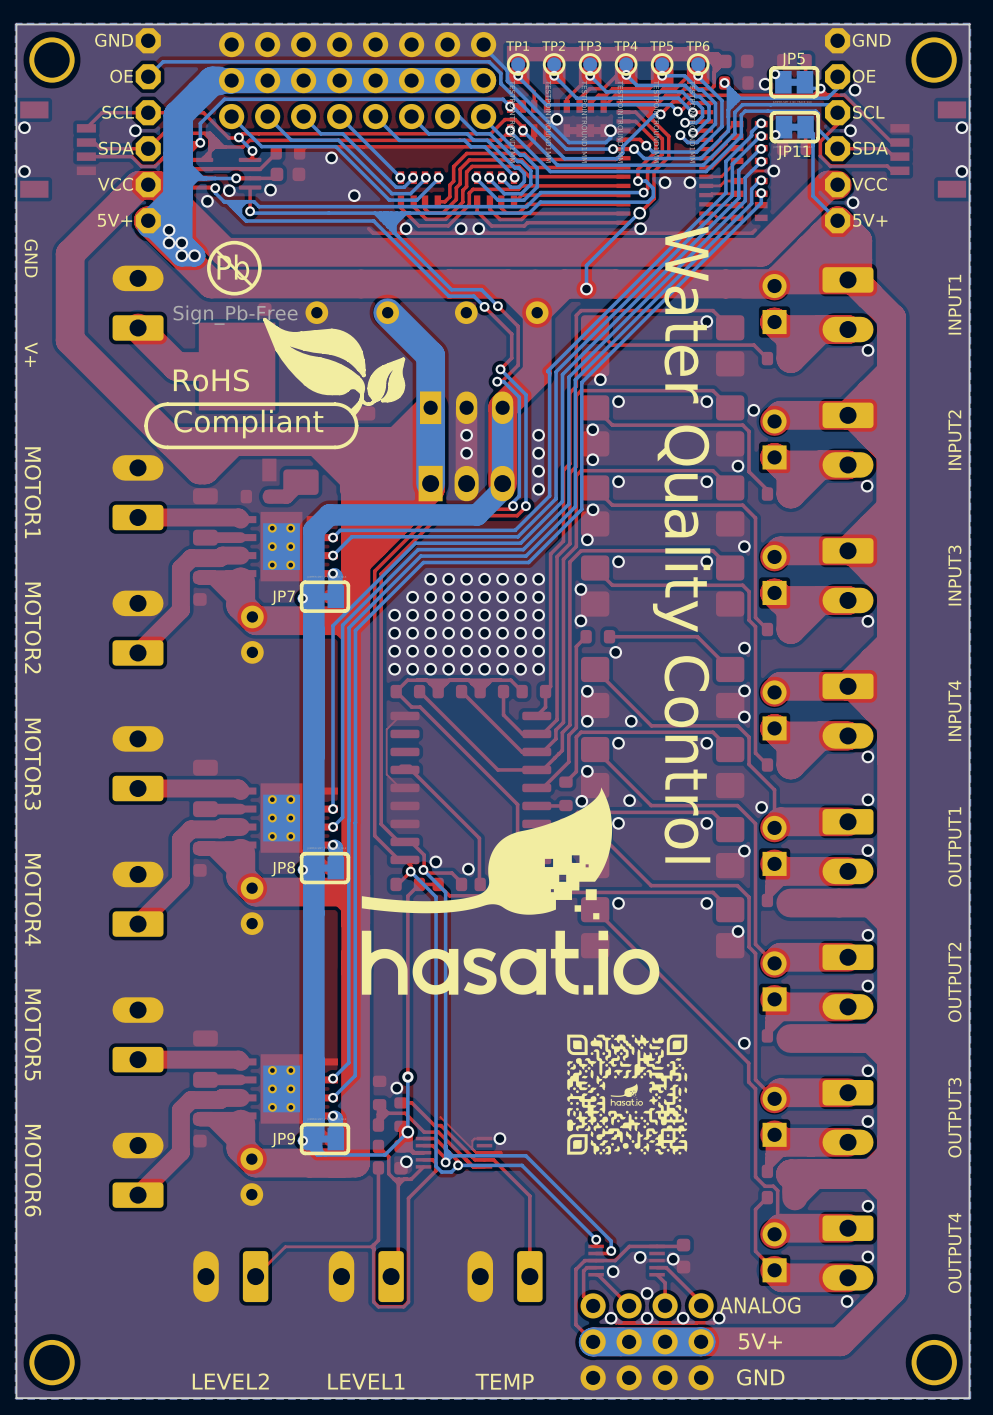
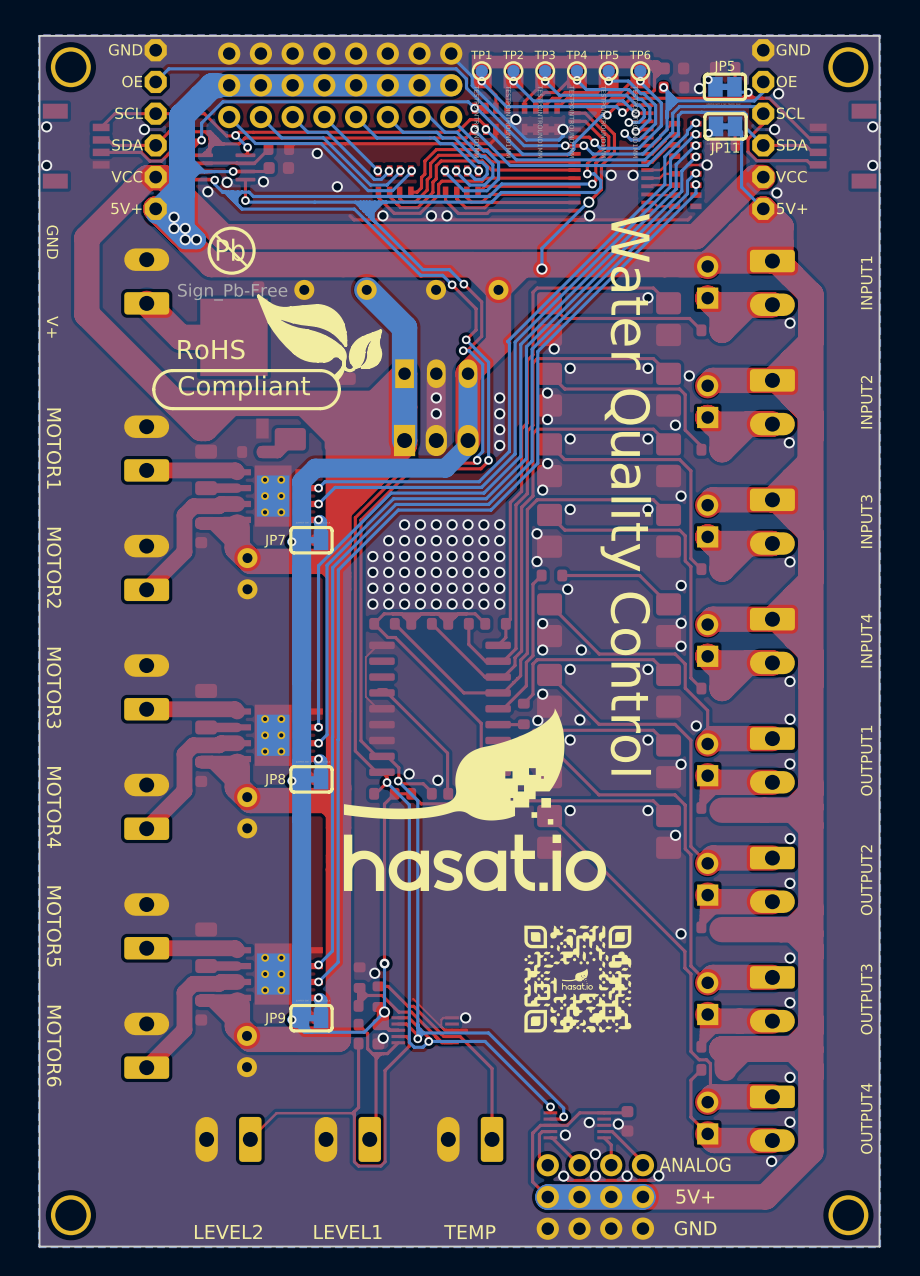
drawing shape: [567, 1034, 688, 1155] -> [524, 925, 632, 1033]

